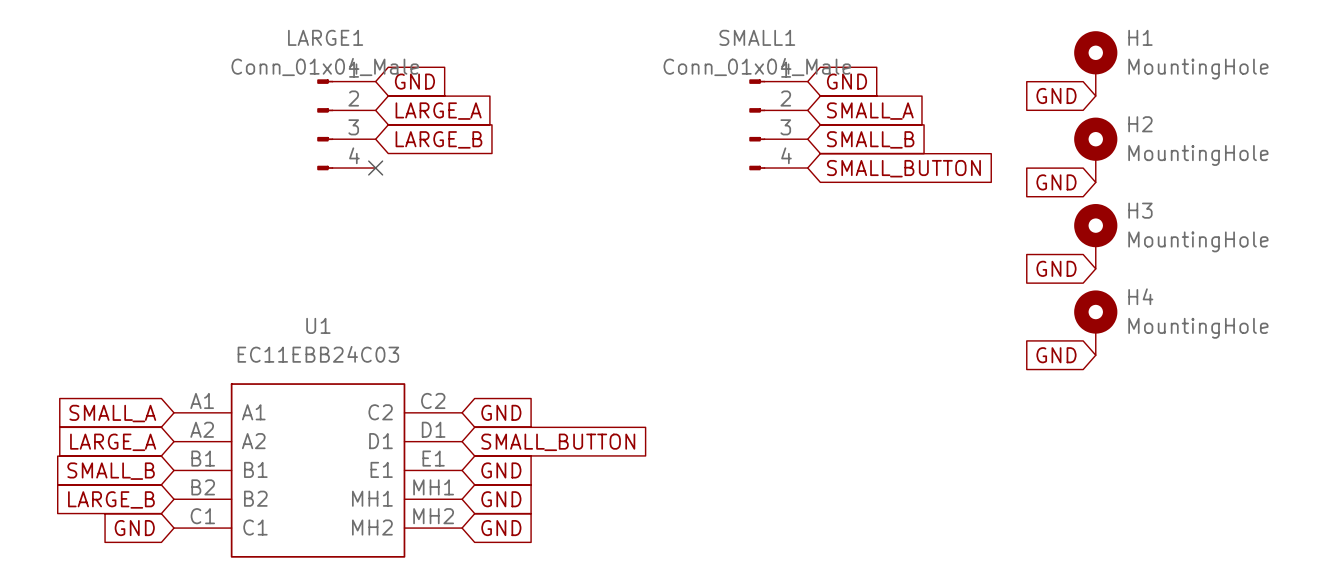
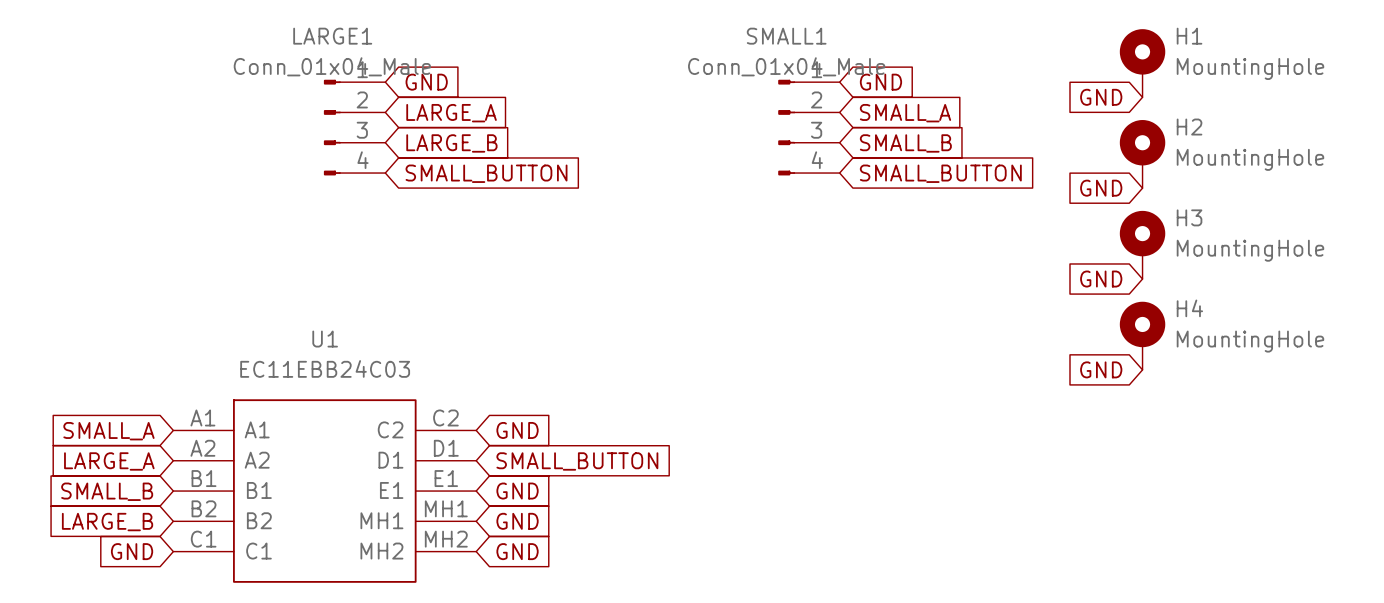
no-connect mark: (375, 168) -> none
global label: none -> SMALL_BUTTON (486, 173)

